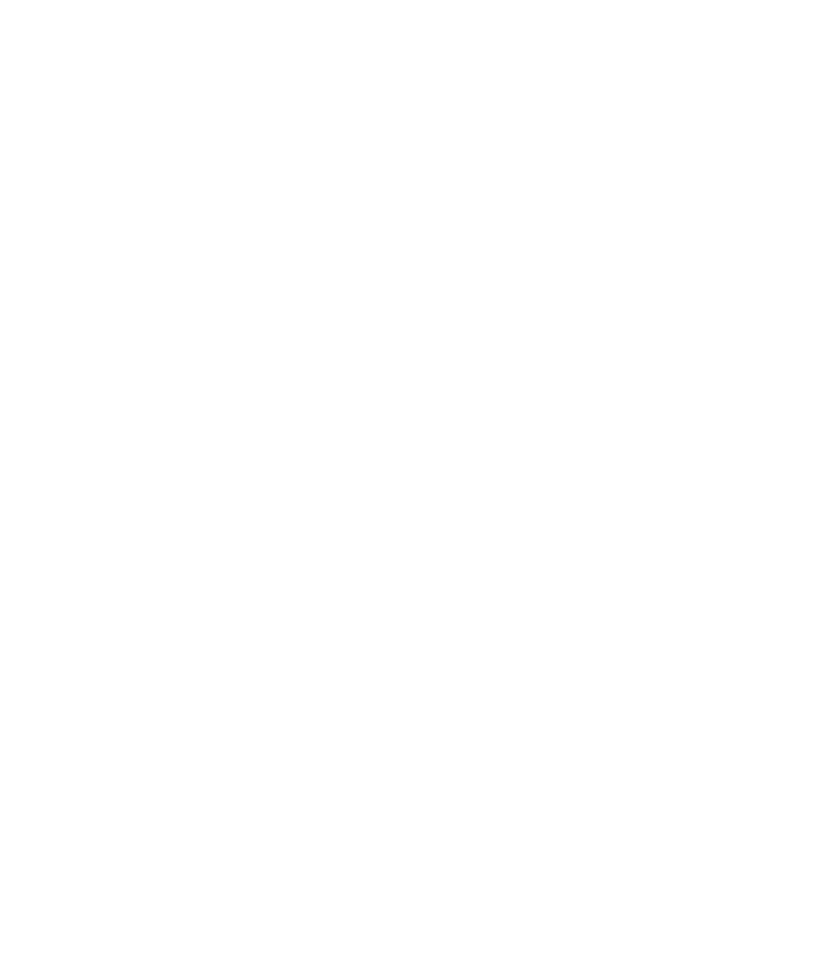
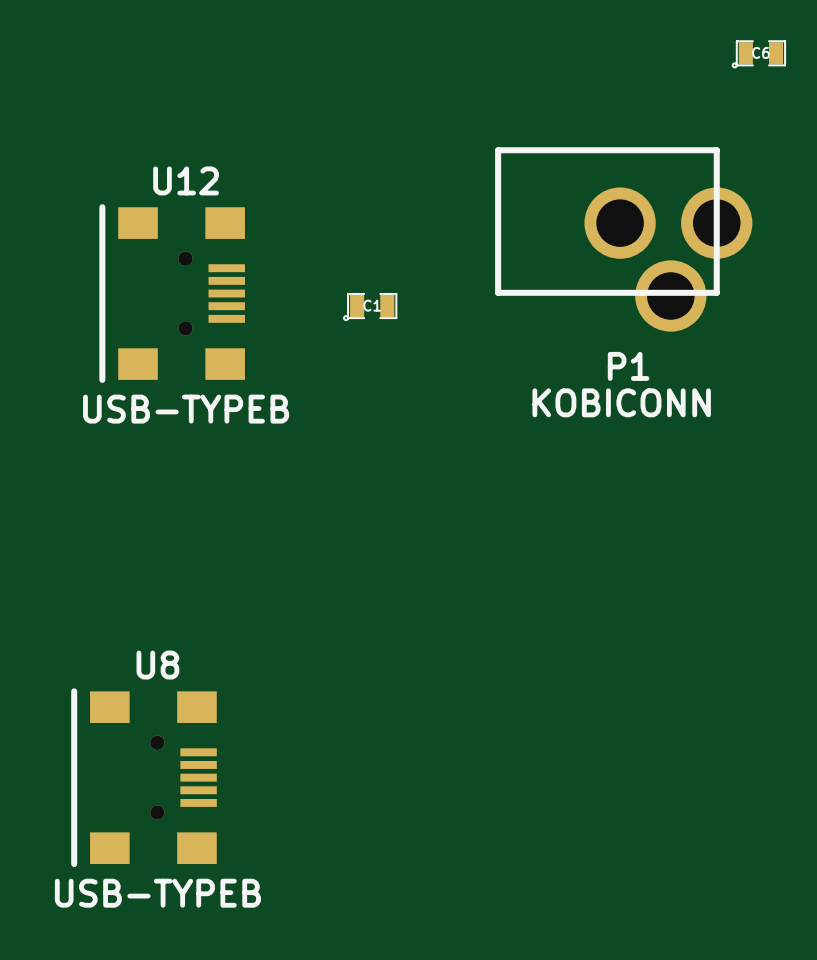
C6: none -> (758, 54)
P1: none -> KOBICONN (623, 239)
U12: none -> USB-TYPEB (172, 293)
C1: none -> (370, 307)
U8: none -> USB-TYPEB (143, 777)

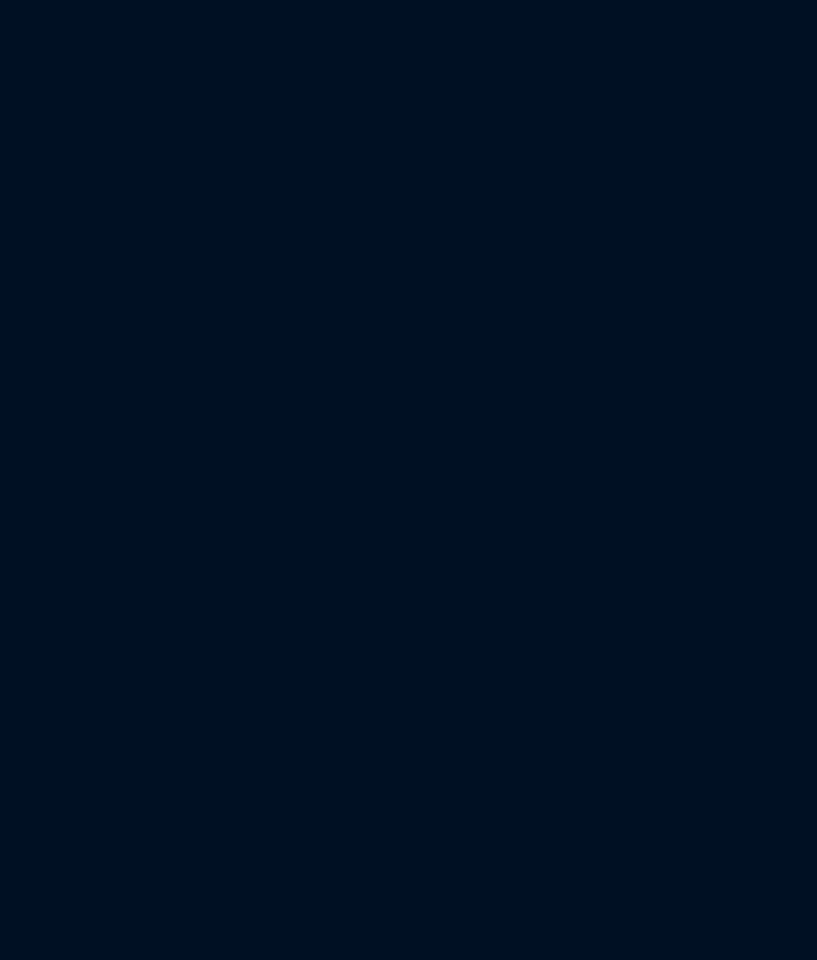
C6: (758, 54) -> none
P1: KOBICONN (623, 239) -> none
U12: USB-TYPEB (172, 293) -> none
C1: (370, 307) -> none
U8: USB-TYPEB (143, 777) -> none

